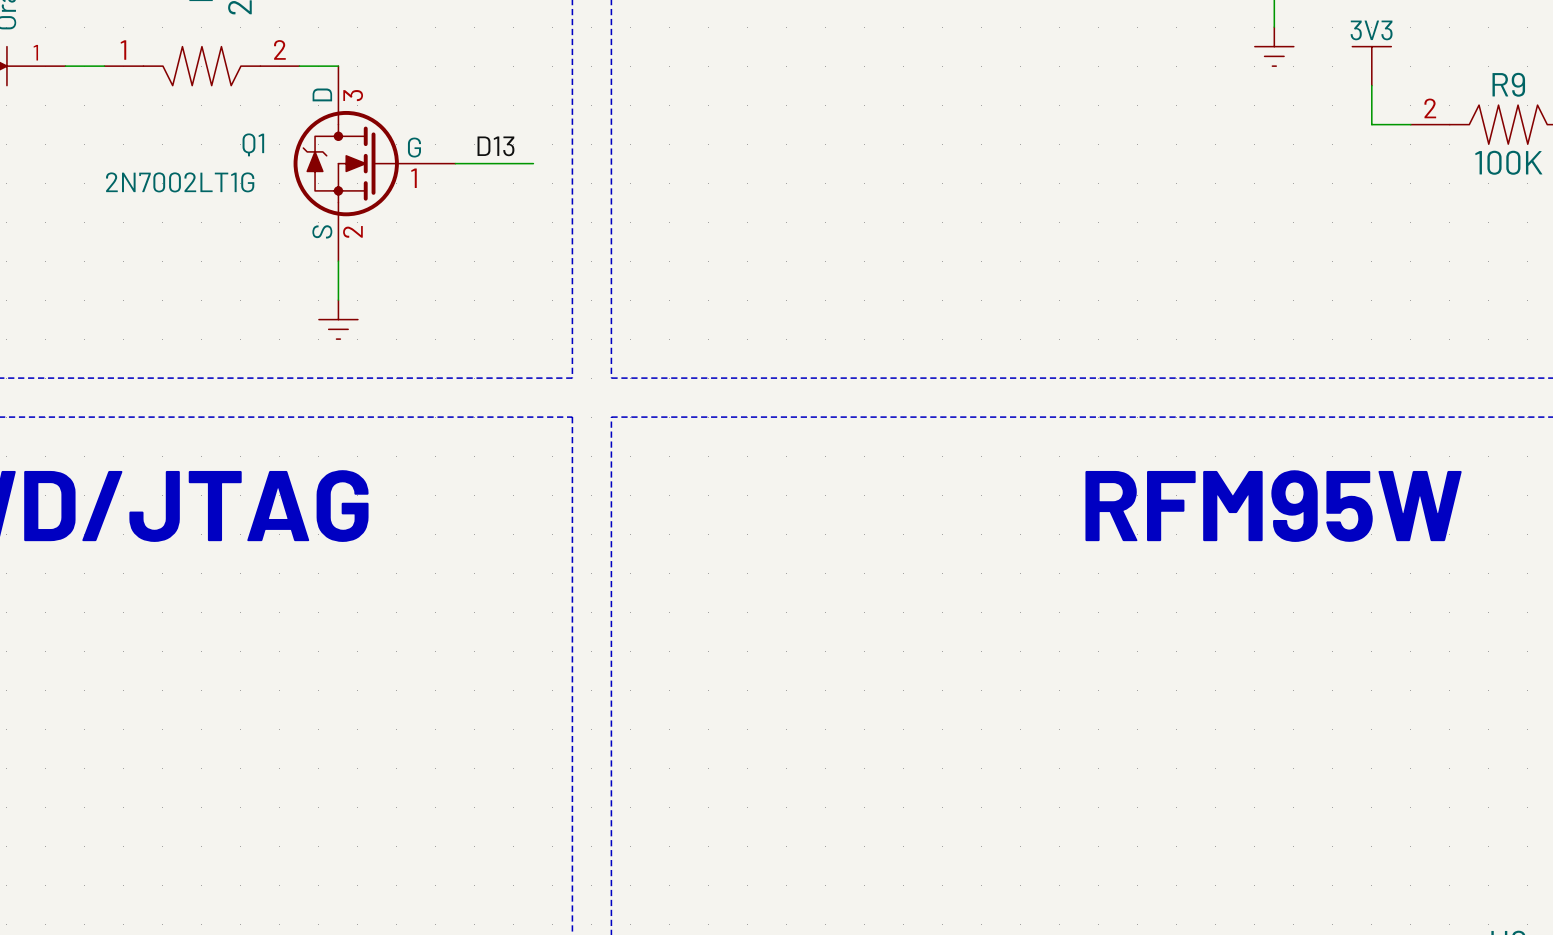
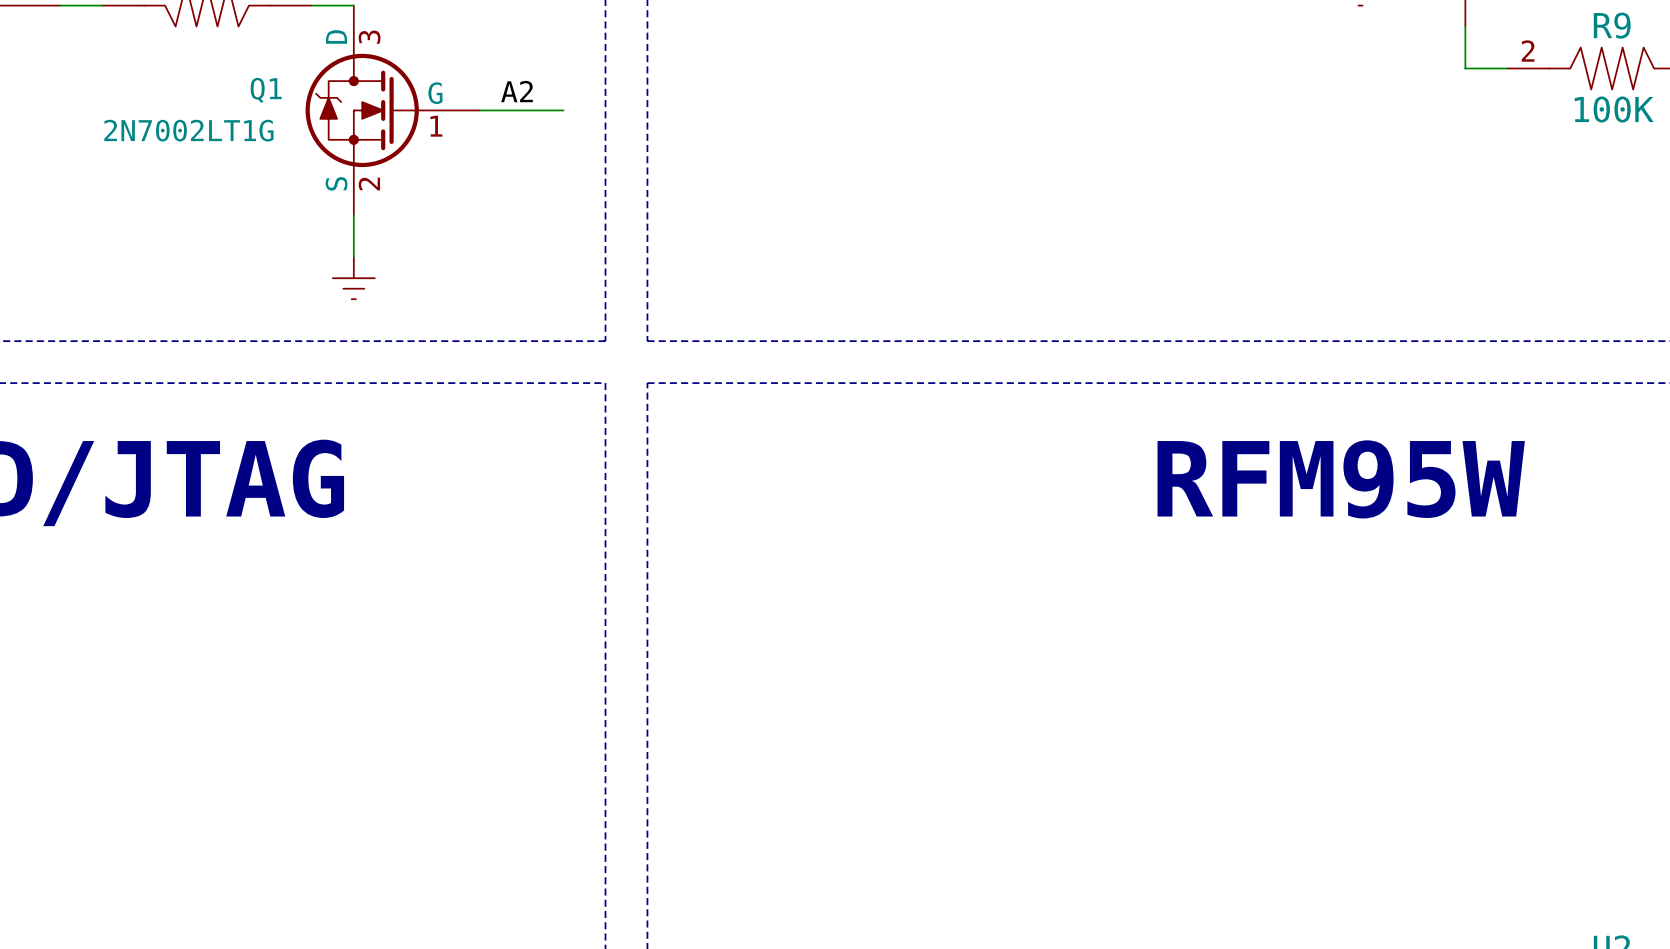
label: D13 (495, 146) -> A2 (516, 91)

